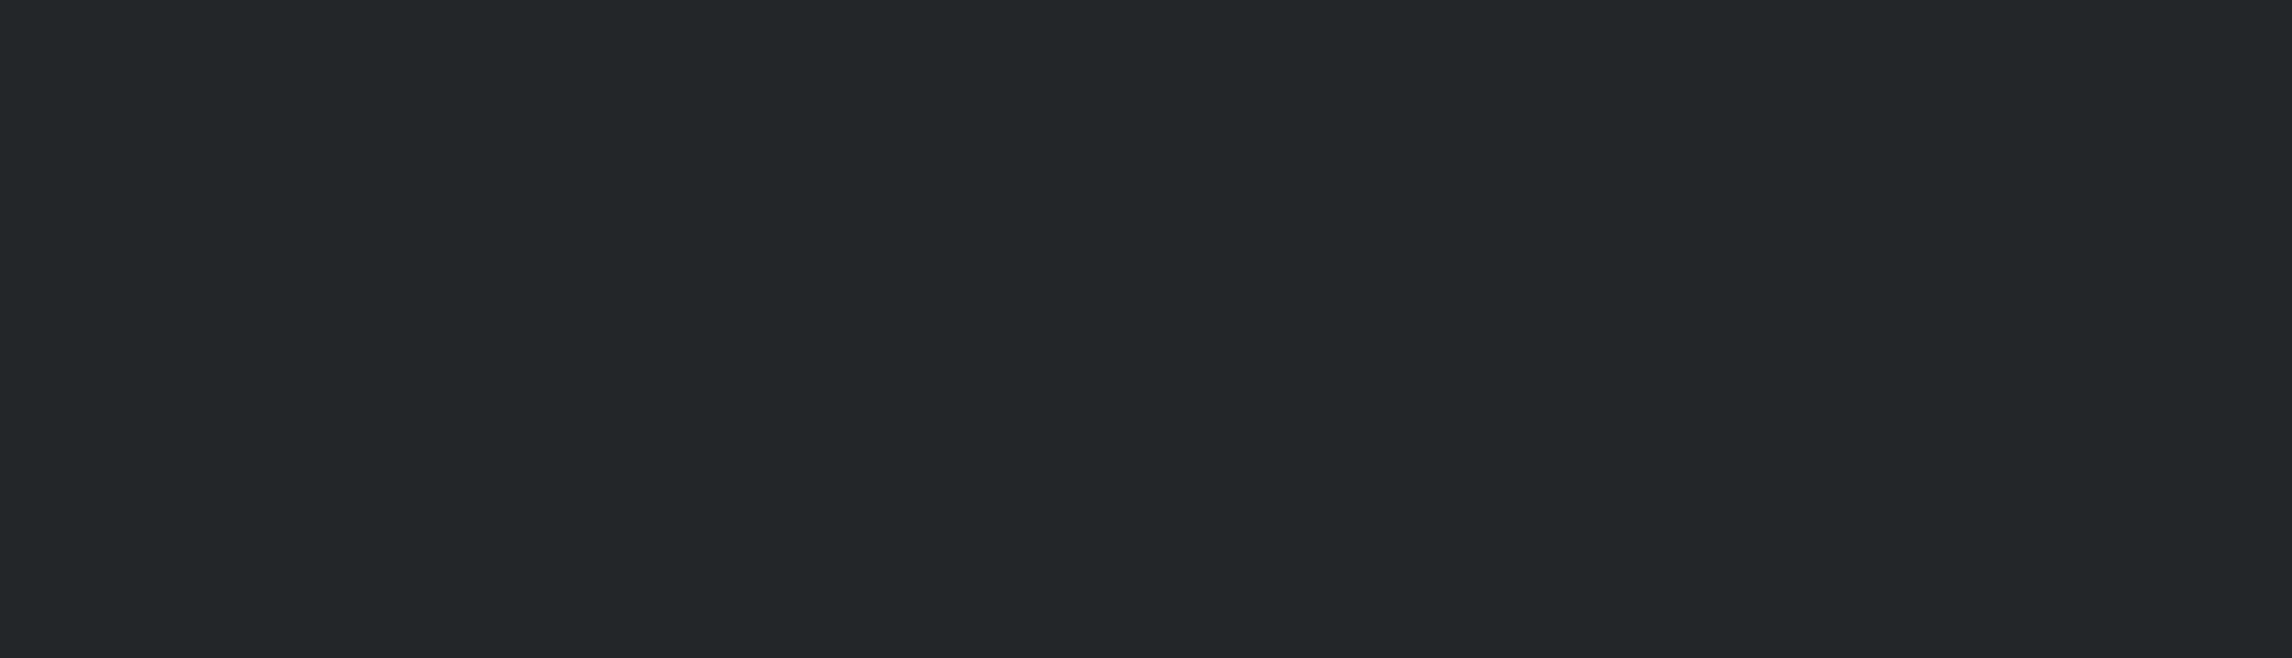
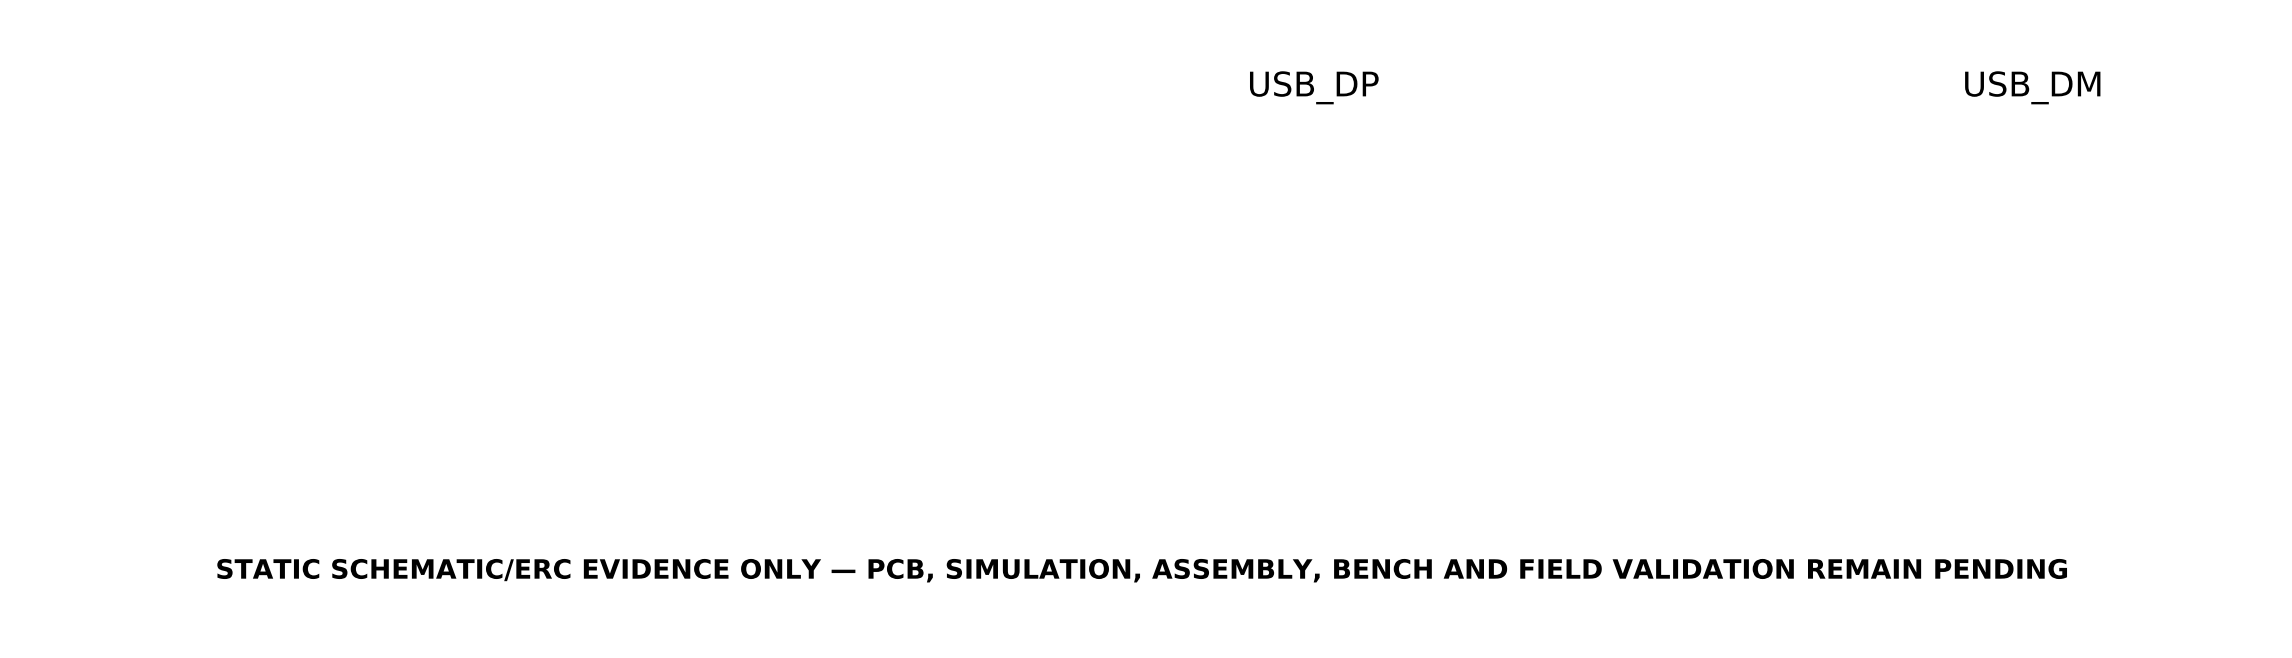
label: none -> USB_DP (1314, 87)
label: none -> USB_DM (2032, 87)
text: none -> STATIC SCHEMATIC/ERC EVIDENCE ONLY — PCB, SIMULATION, ASSEMBLY, BENCH AND FIELD VALIDATION REMAIN PENDING (1142, 570)

